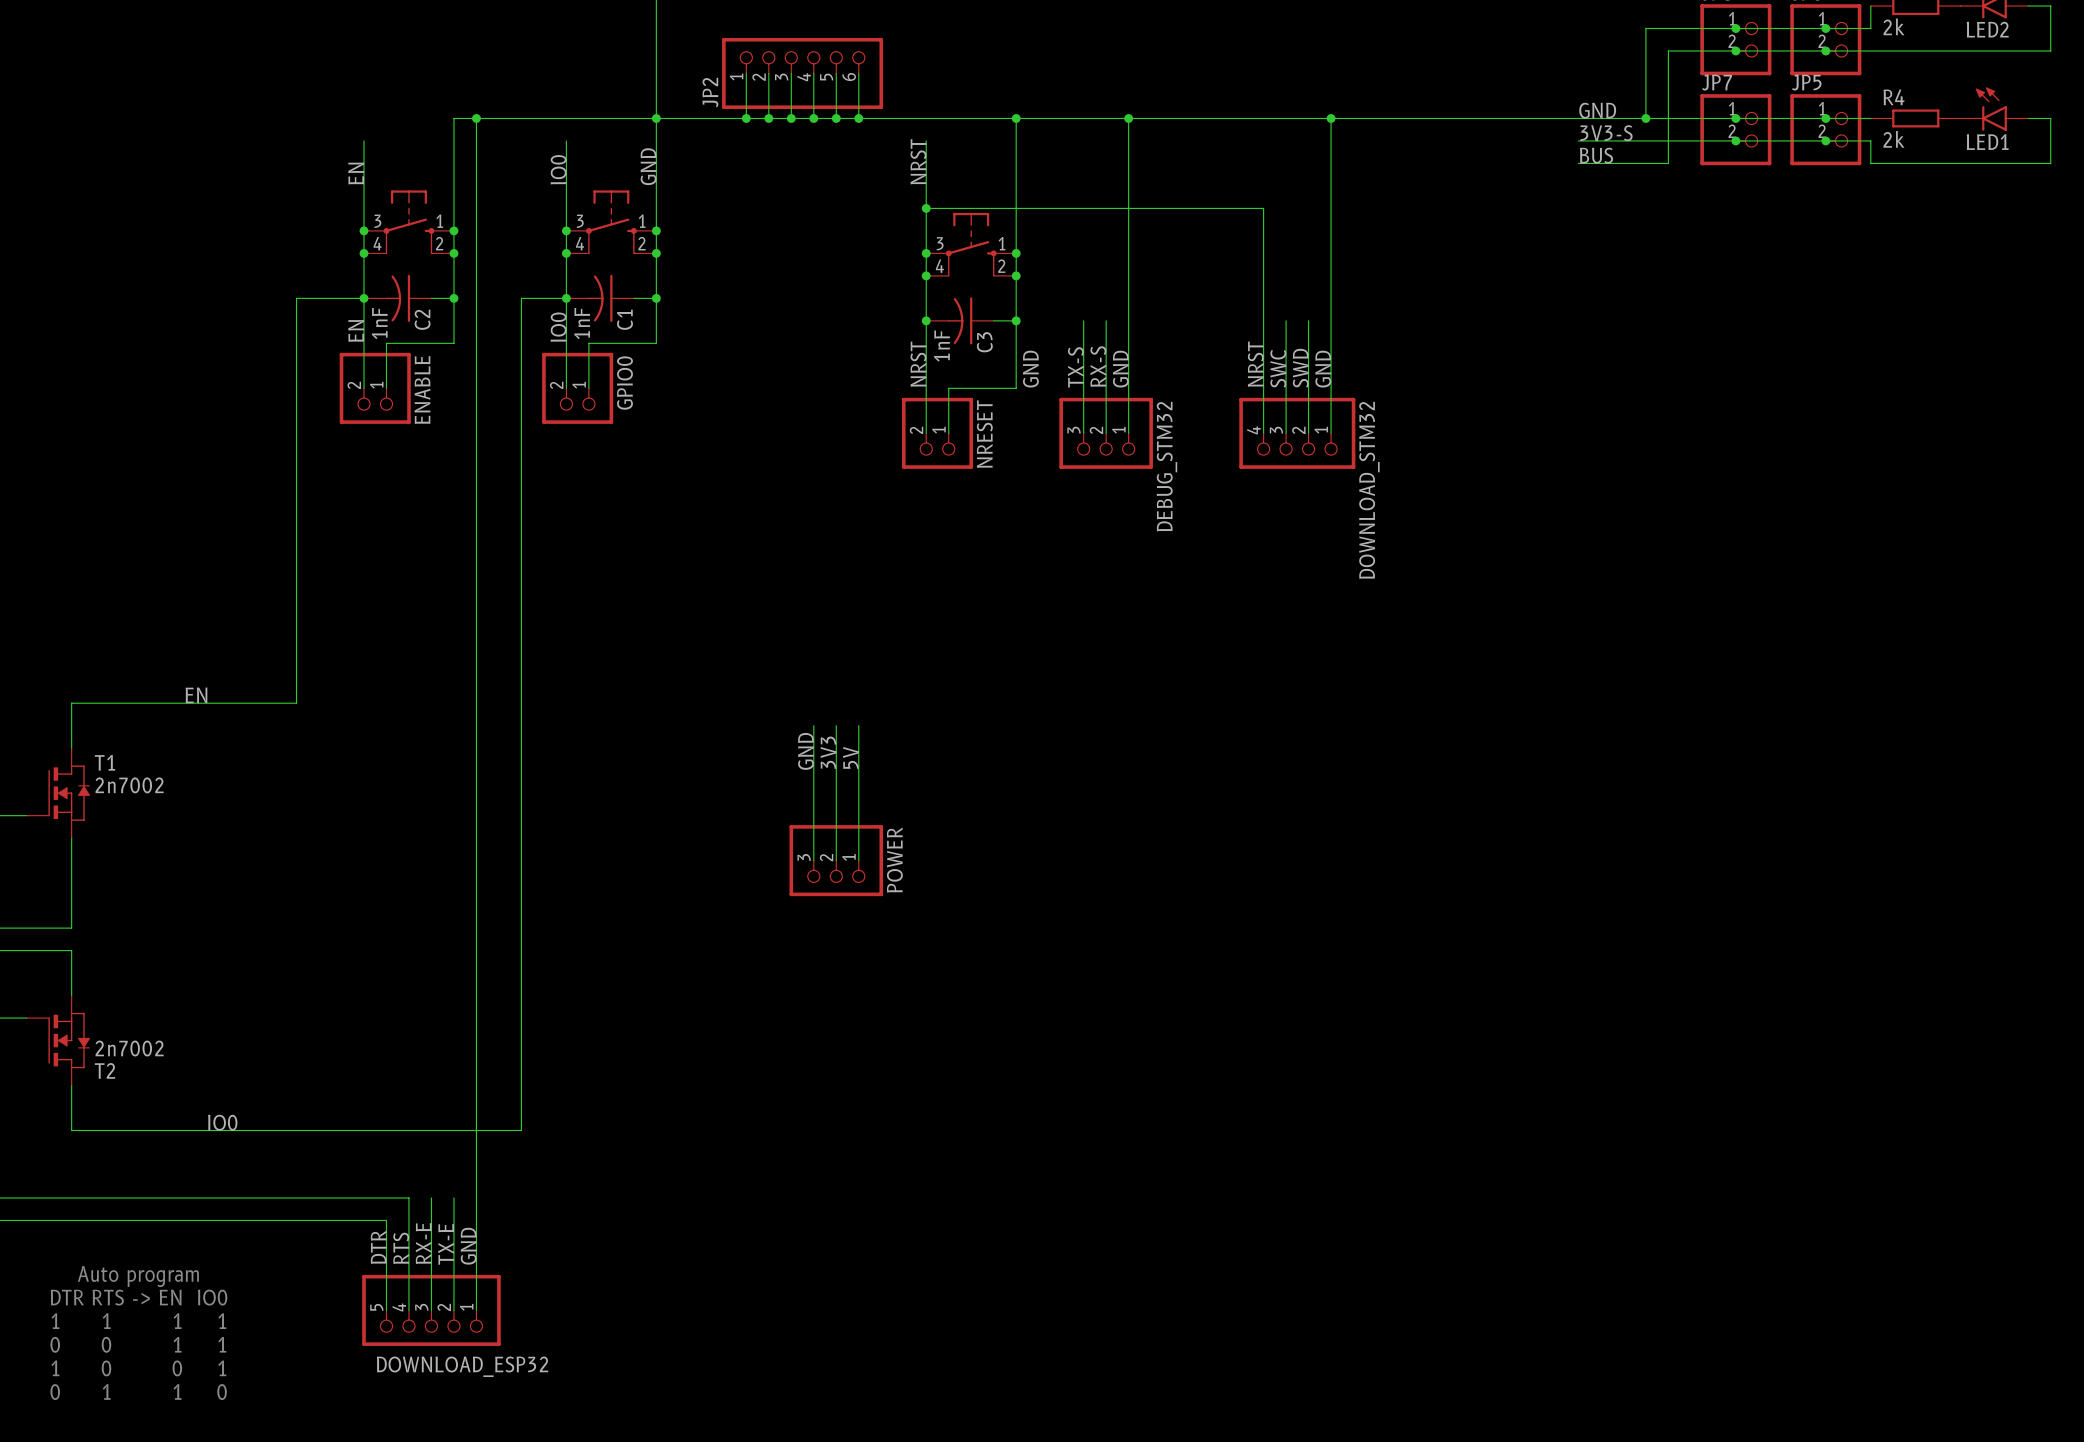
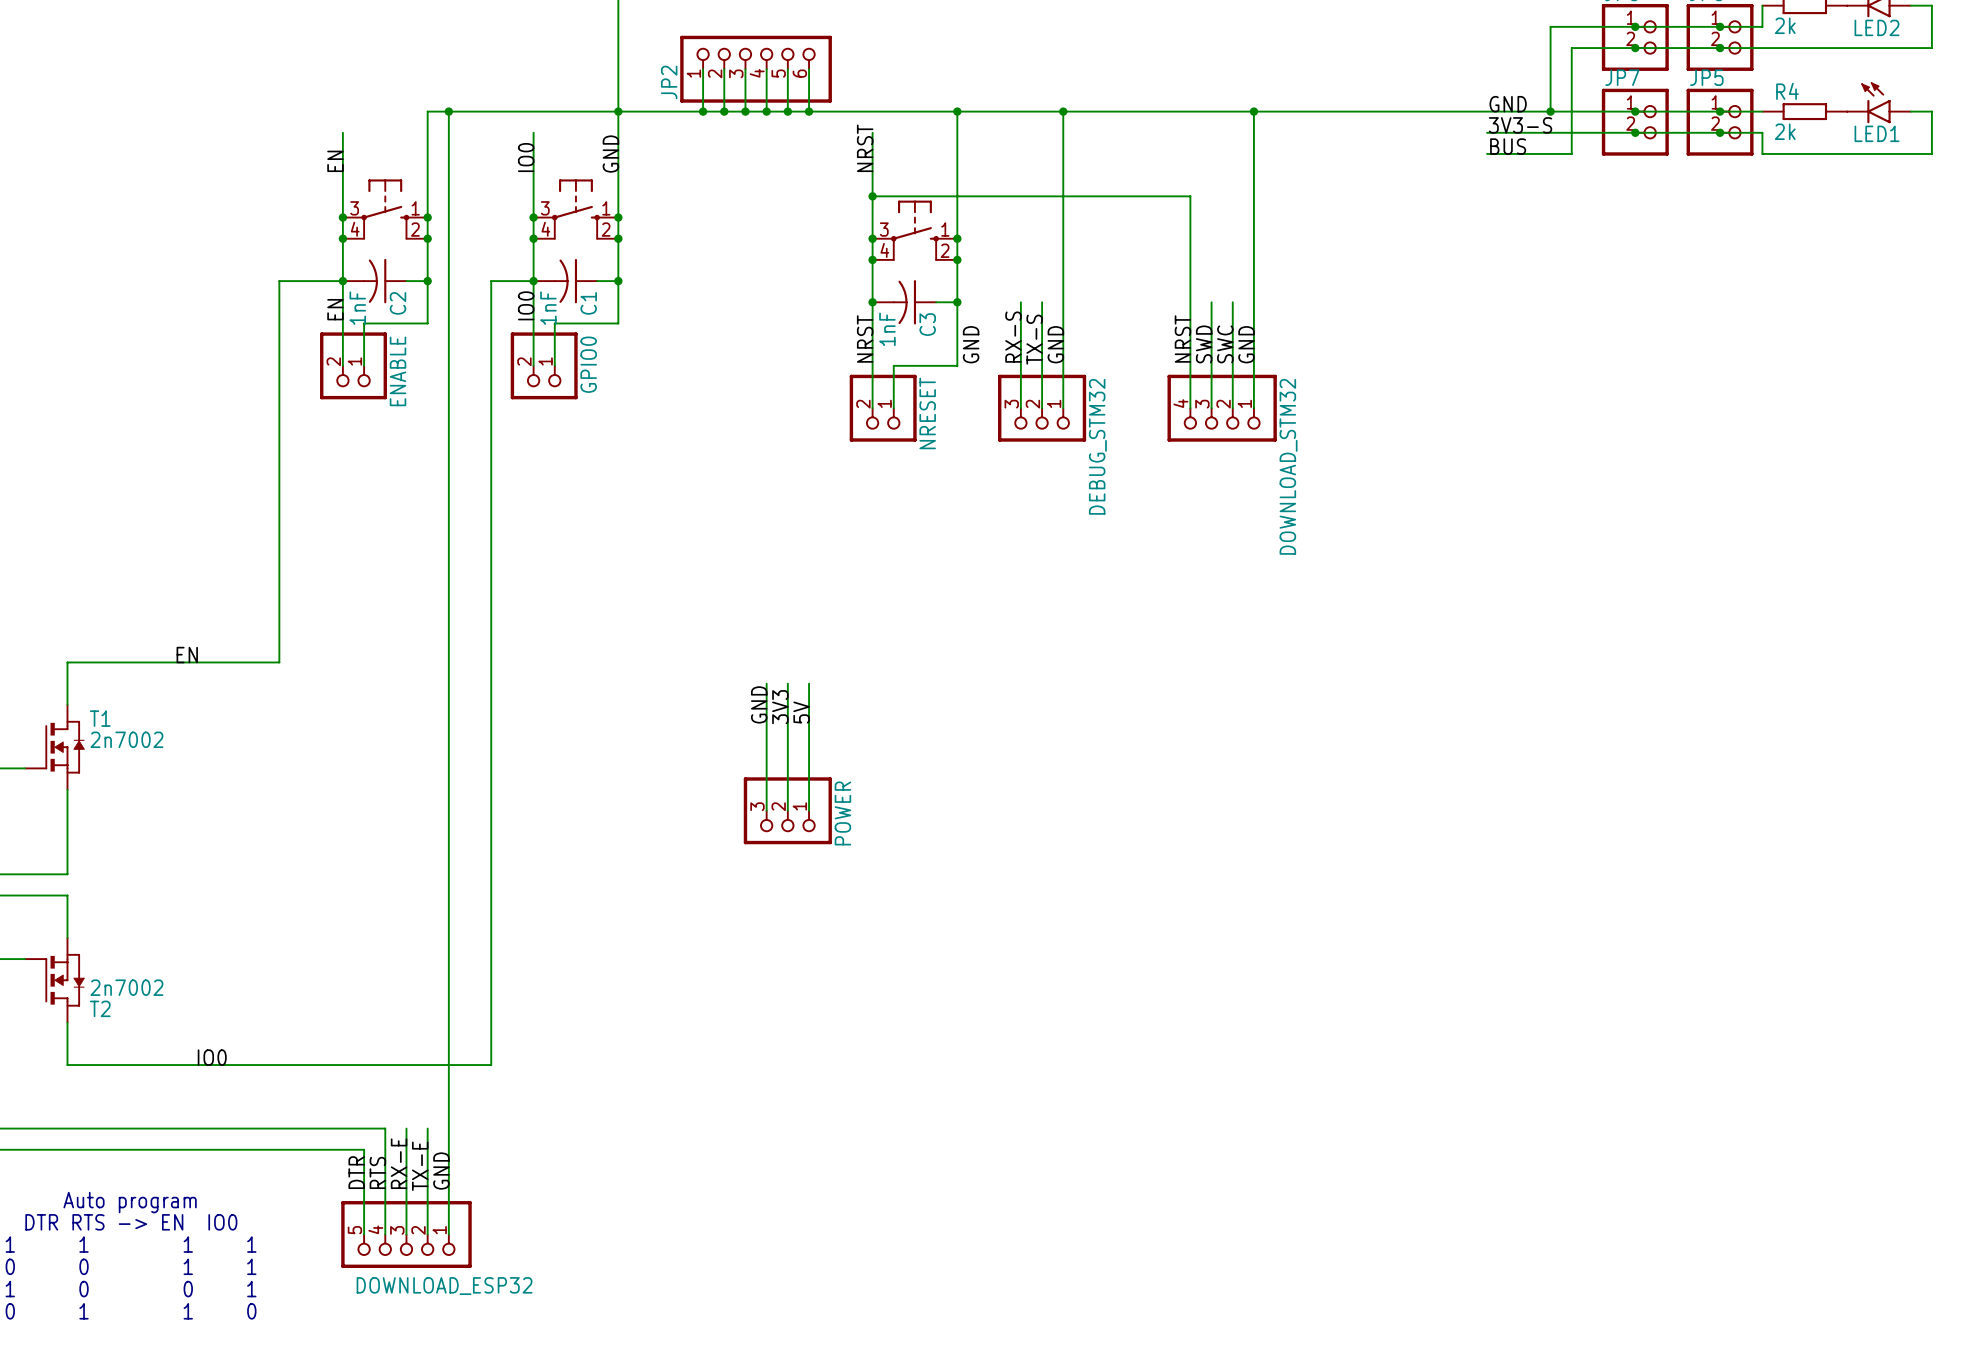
label: RX-S (1098, 366) -> TX-S (1034, 339)
label: TX-S (1075, 367) -> RX-S (1013, 337)
label: SWC (1278, 368) -> SWD (1204, 344)
label: SWD (1300, 368) -> SWC (1225, 344)

